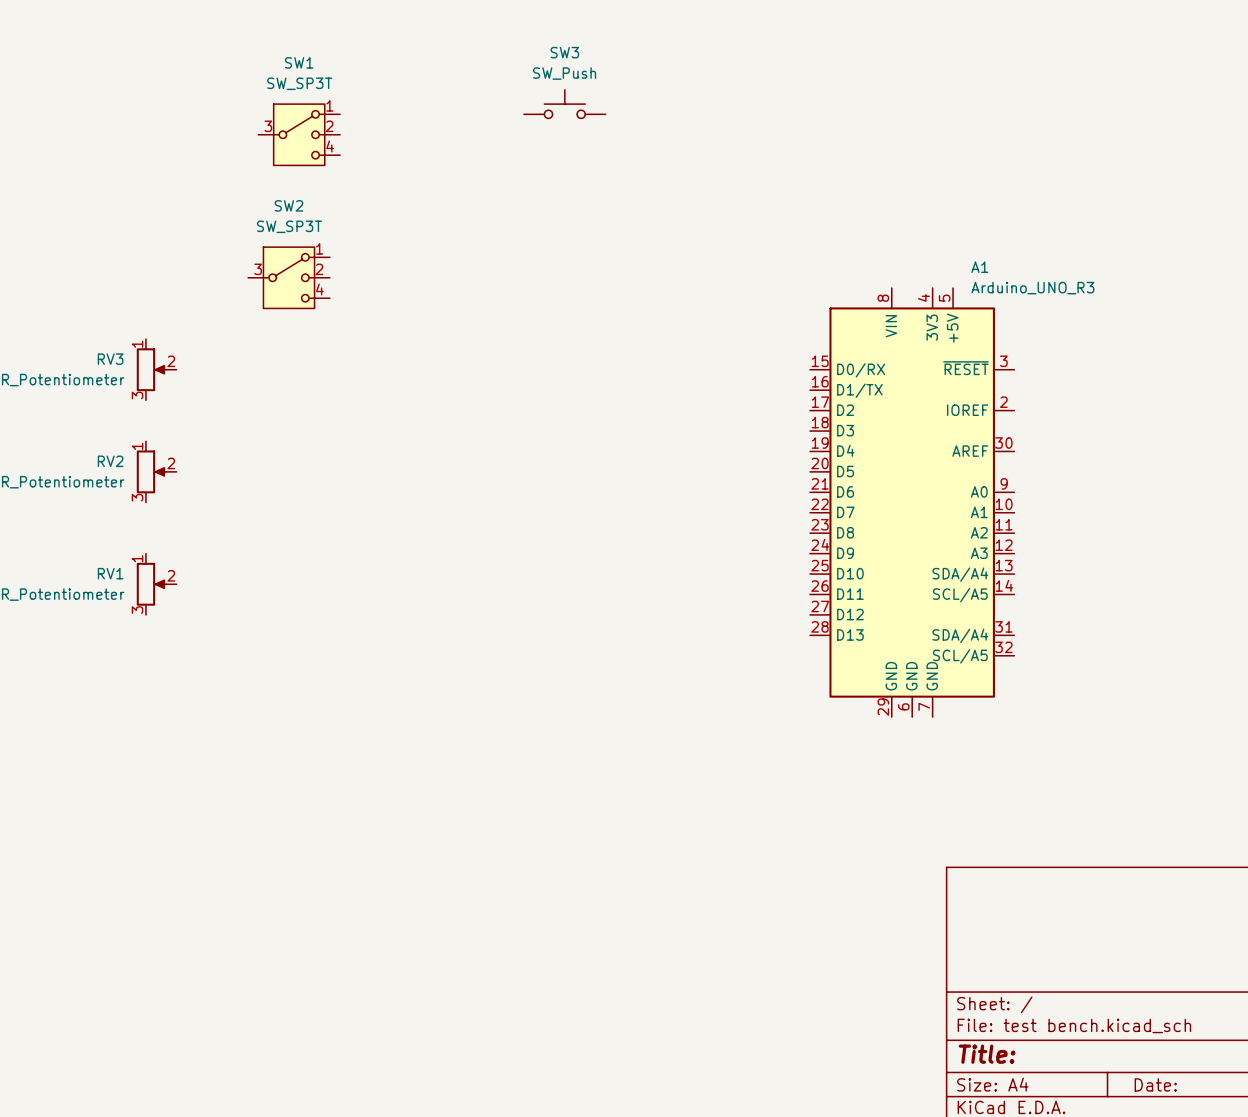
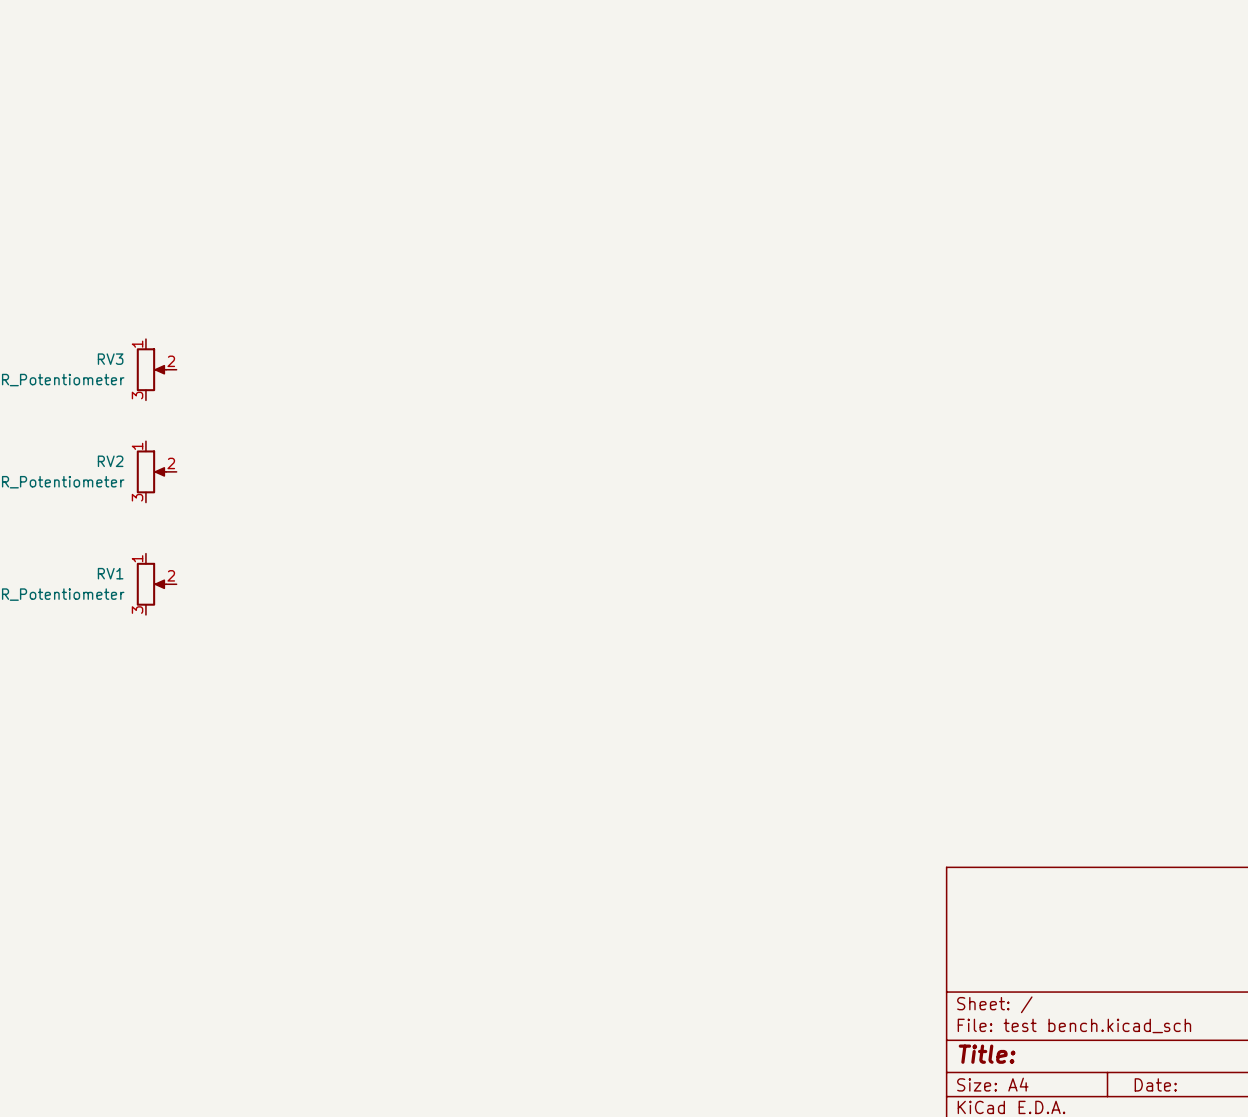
SW3: SW_Push (564, 104) -> none
SW1: SW_SP3T (299, 134) -> none
SW2: SW_SP3T (288, 277) -> none
A1: Arduino_UNO_R3 (912, 502) -> none

